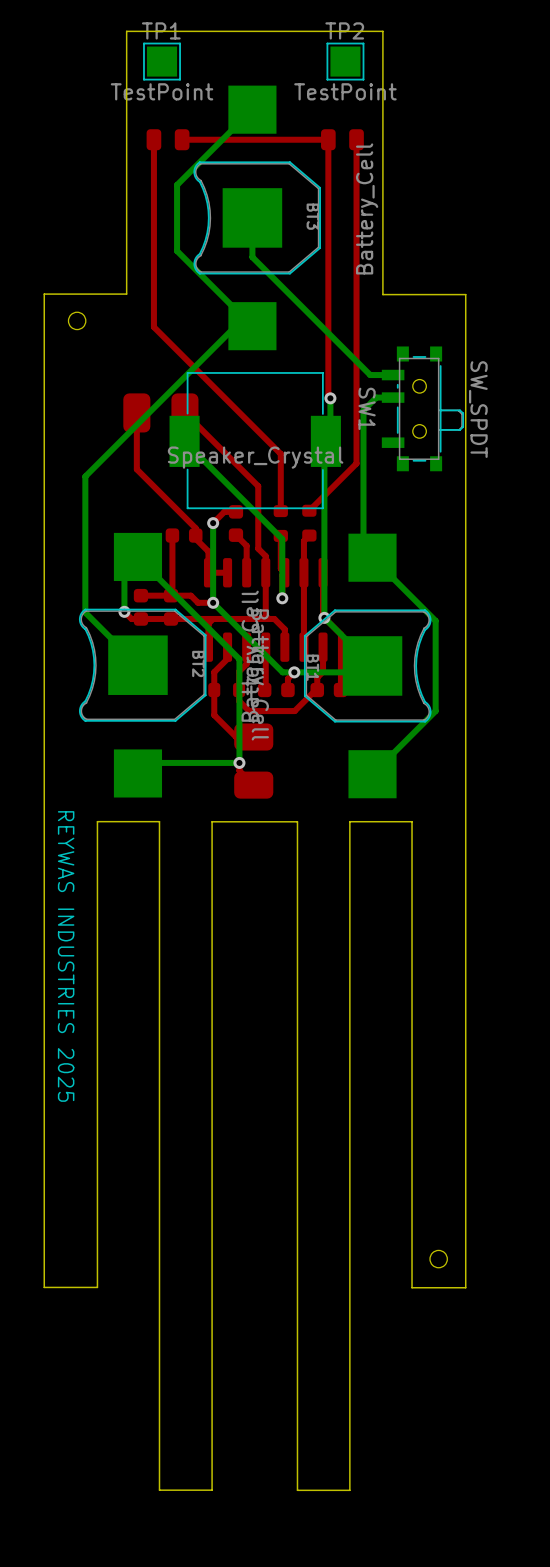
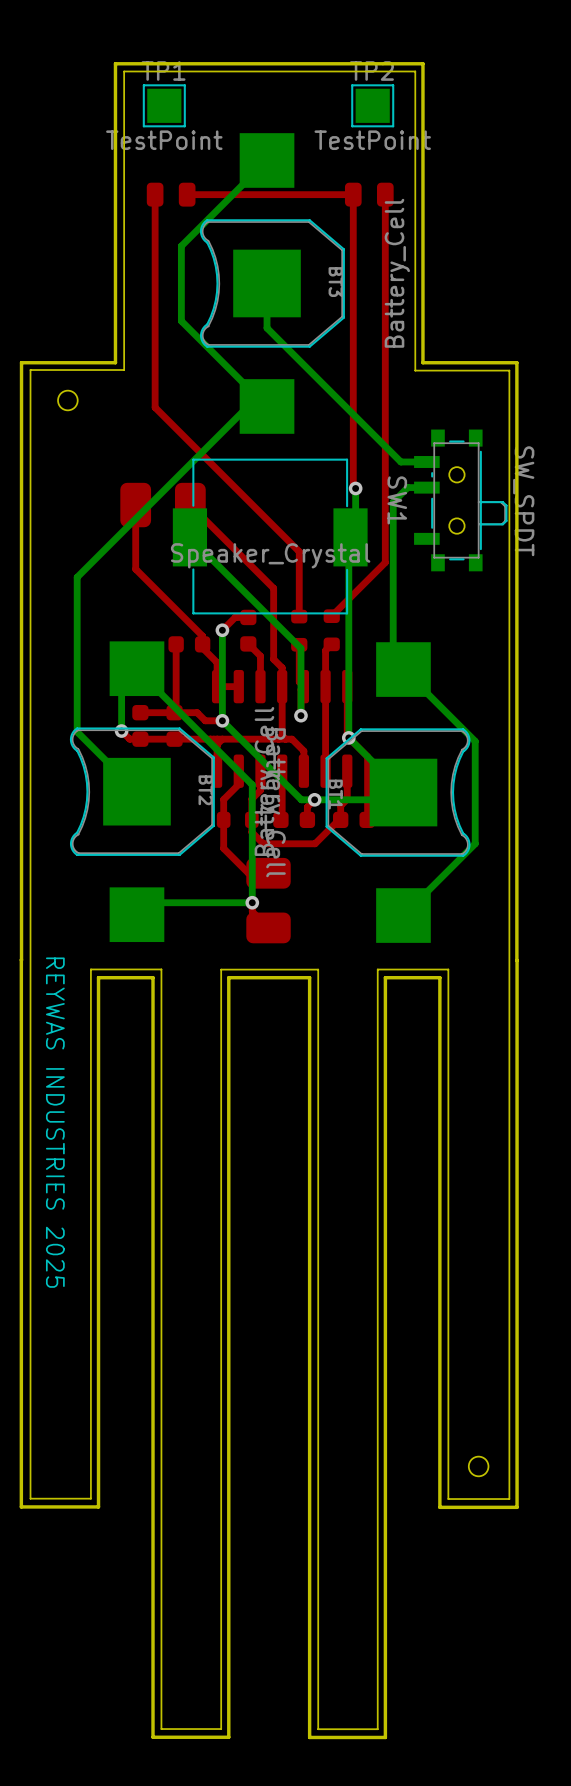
board edge: none -> (21, 959) (21, 362) (115, 362) (115, 63) (422, 63) (422, 362) (516, 362) (516, 960)
board edge: none -> (21, 959) (21, 1506) (98, 1506) (98, 977) (153, 977) (153, 1737) (228, 1737) (228, 977) (309, 977) (309, 1737) (385, 1737) (385, 977) (439, 977) (439, 1507) (517, 1507) (517, 960)

